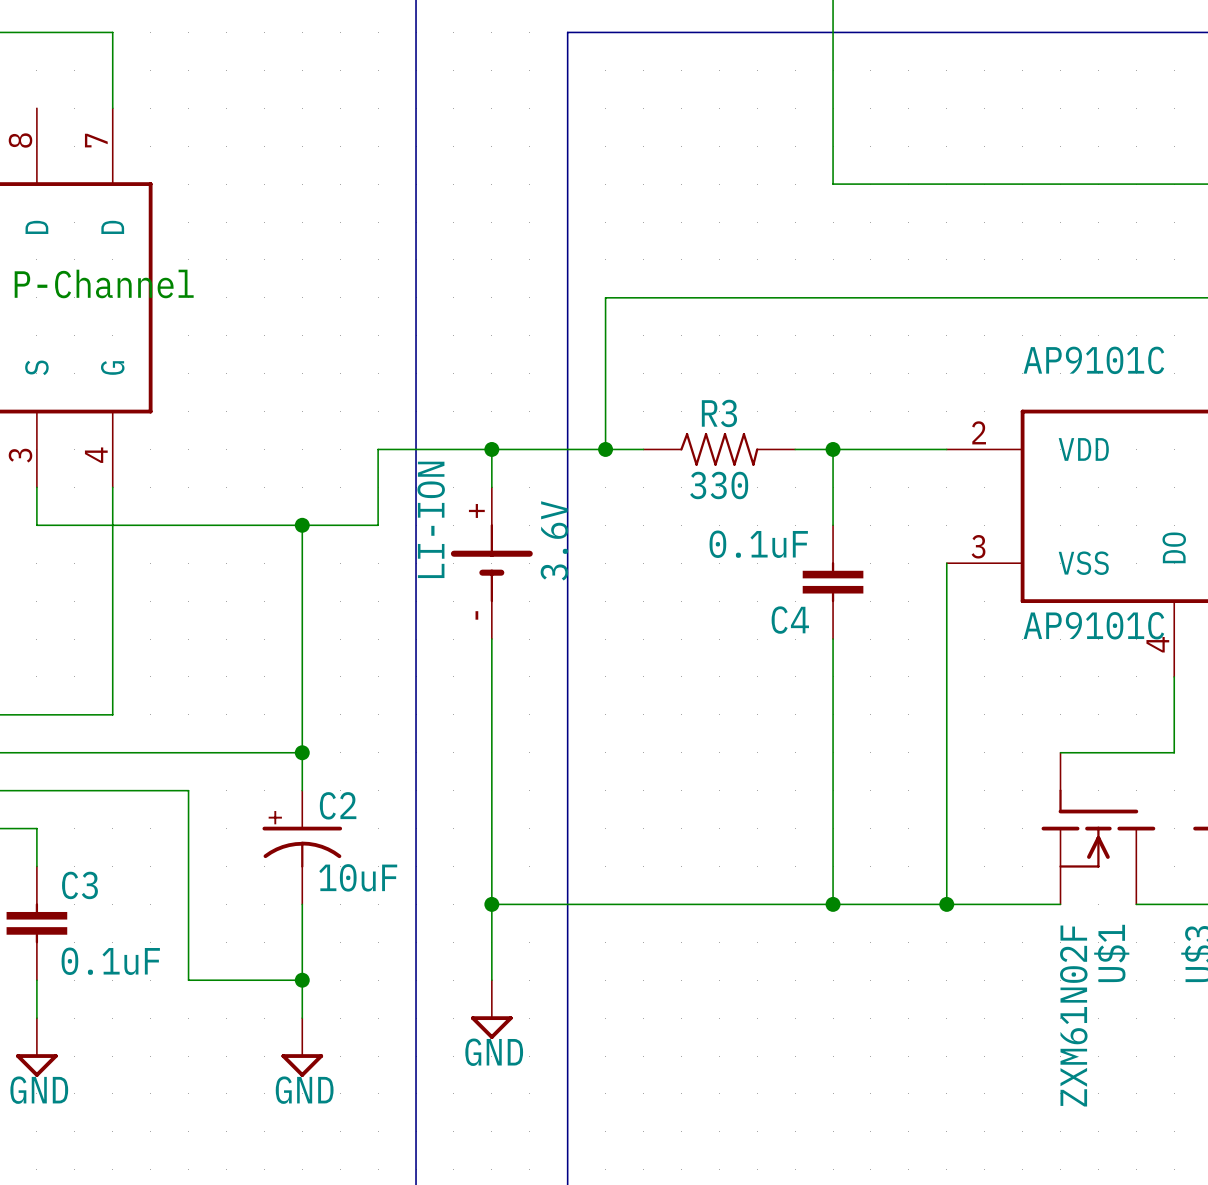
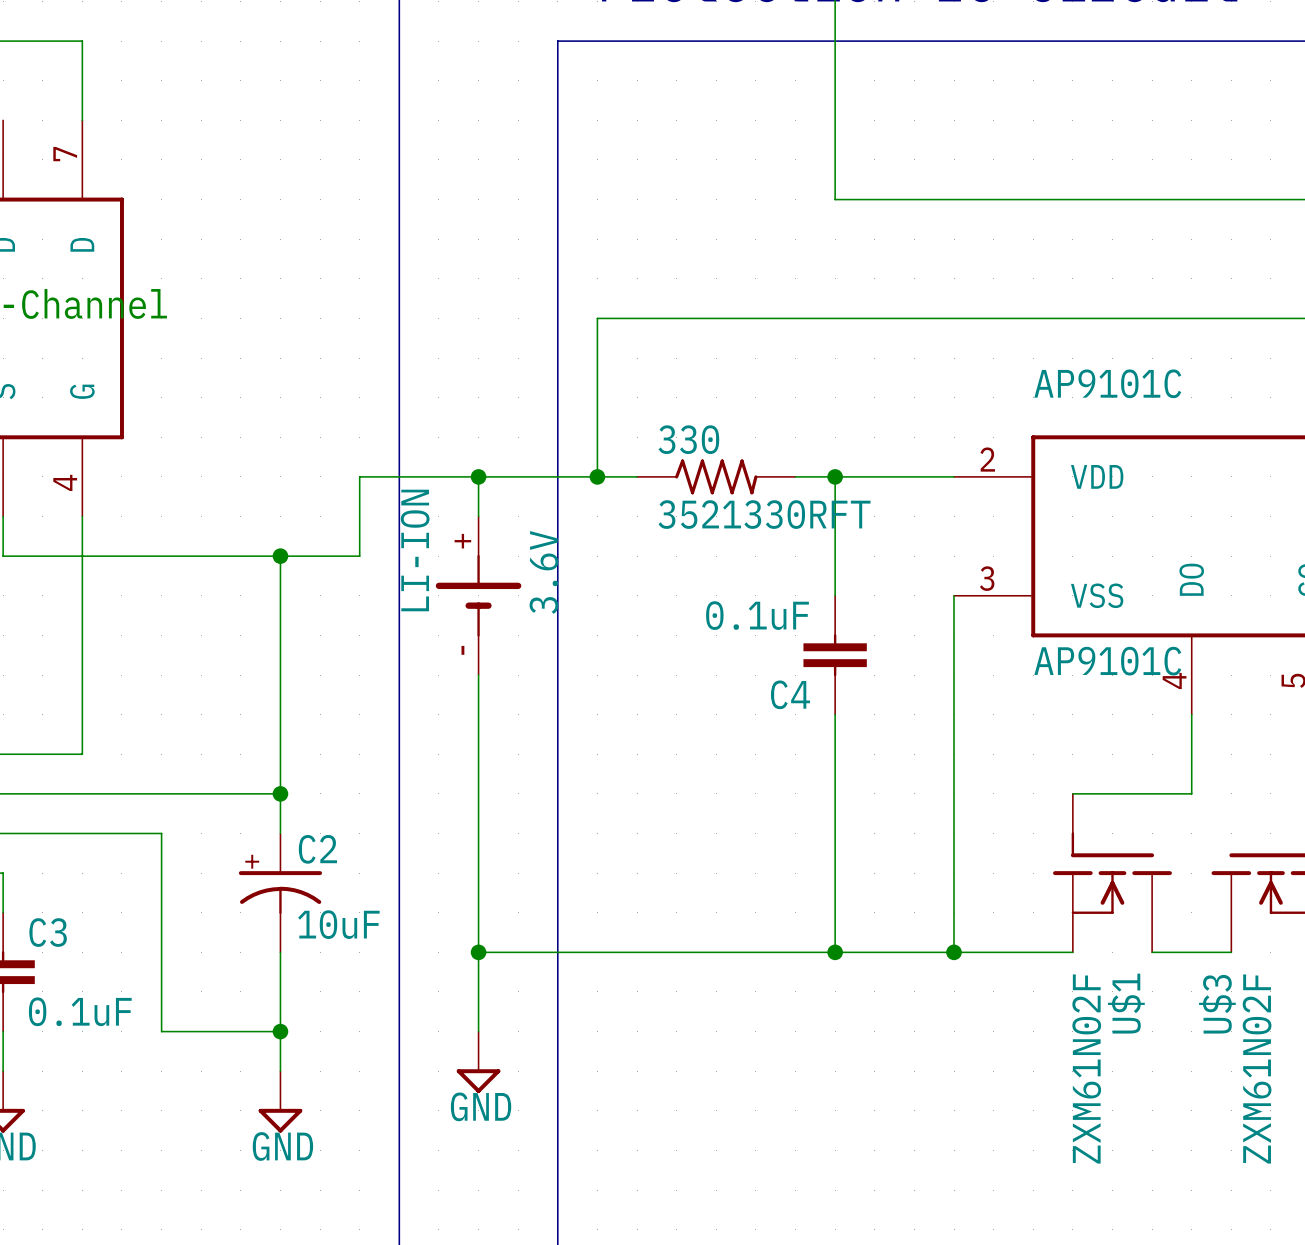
R3: 330 (719, 449) -> none
330: none -> 3521330RFT (716, 476)
C4 position: (833, 582) -> (835, 655)

